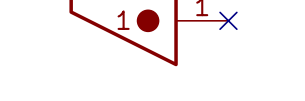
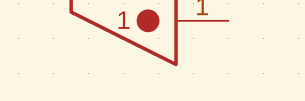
no-connect mark: (228, 20) -> none

